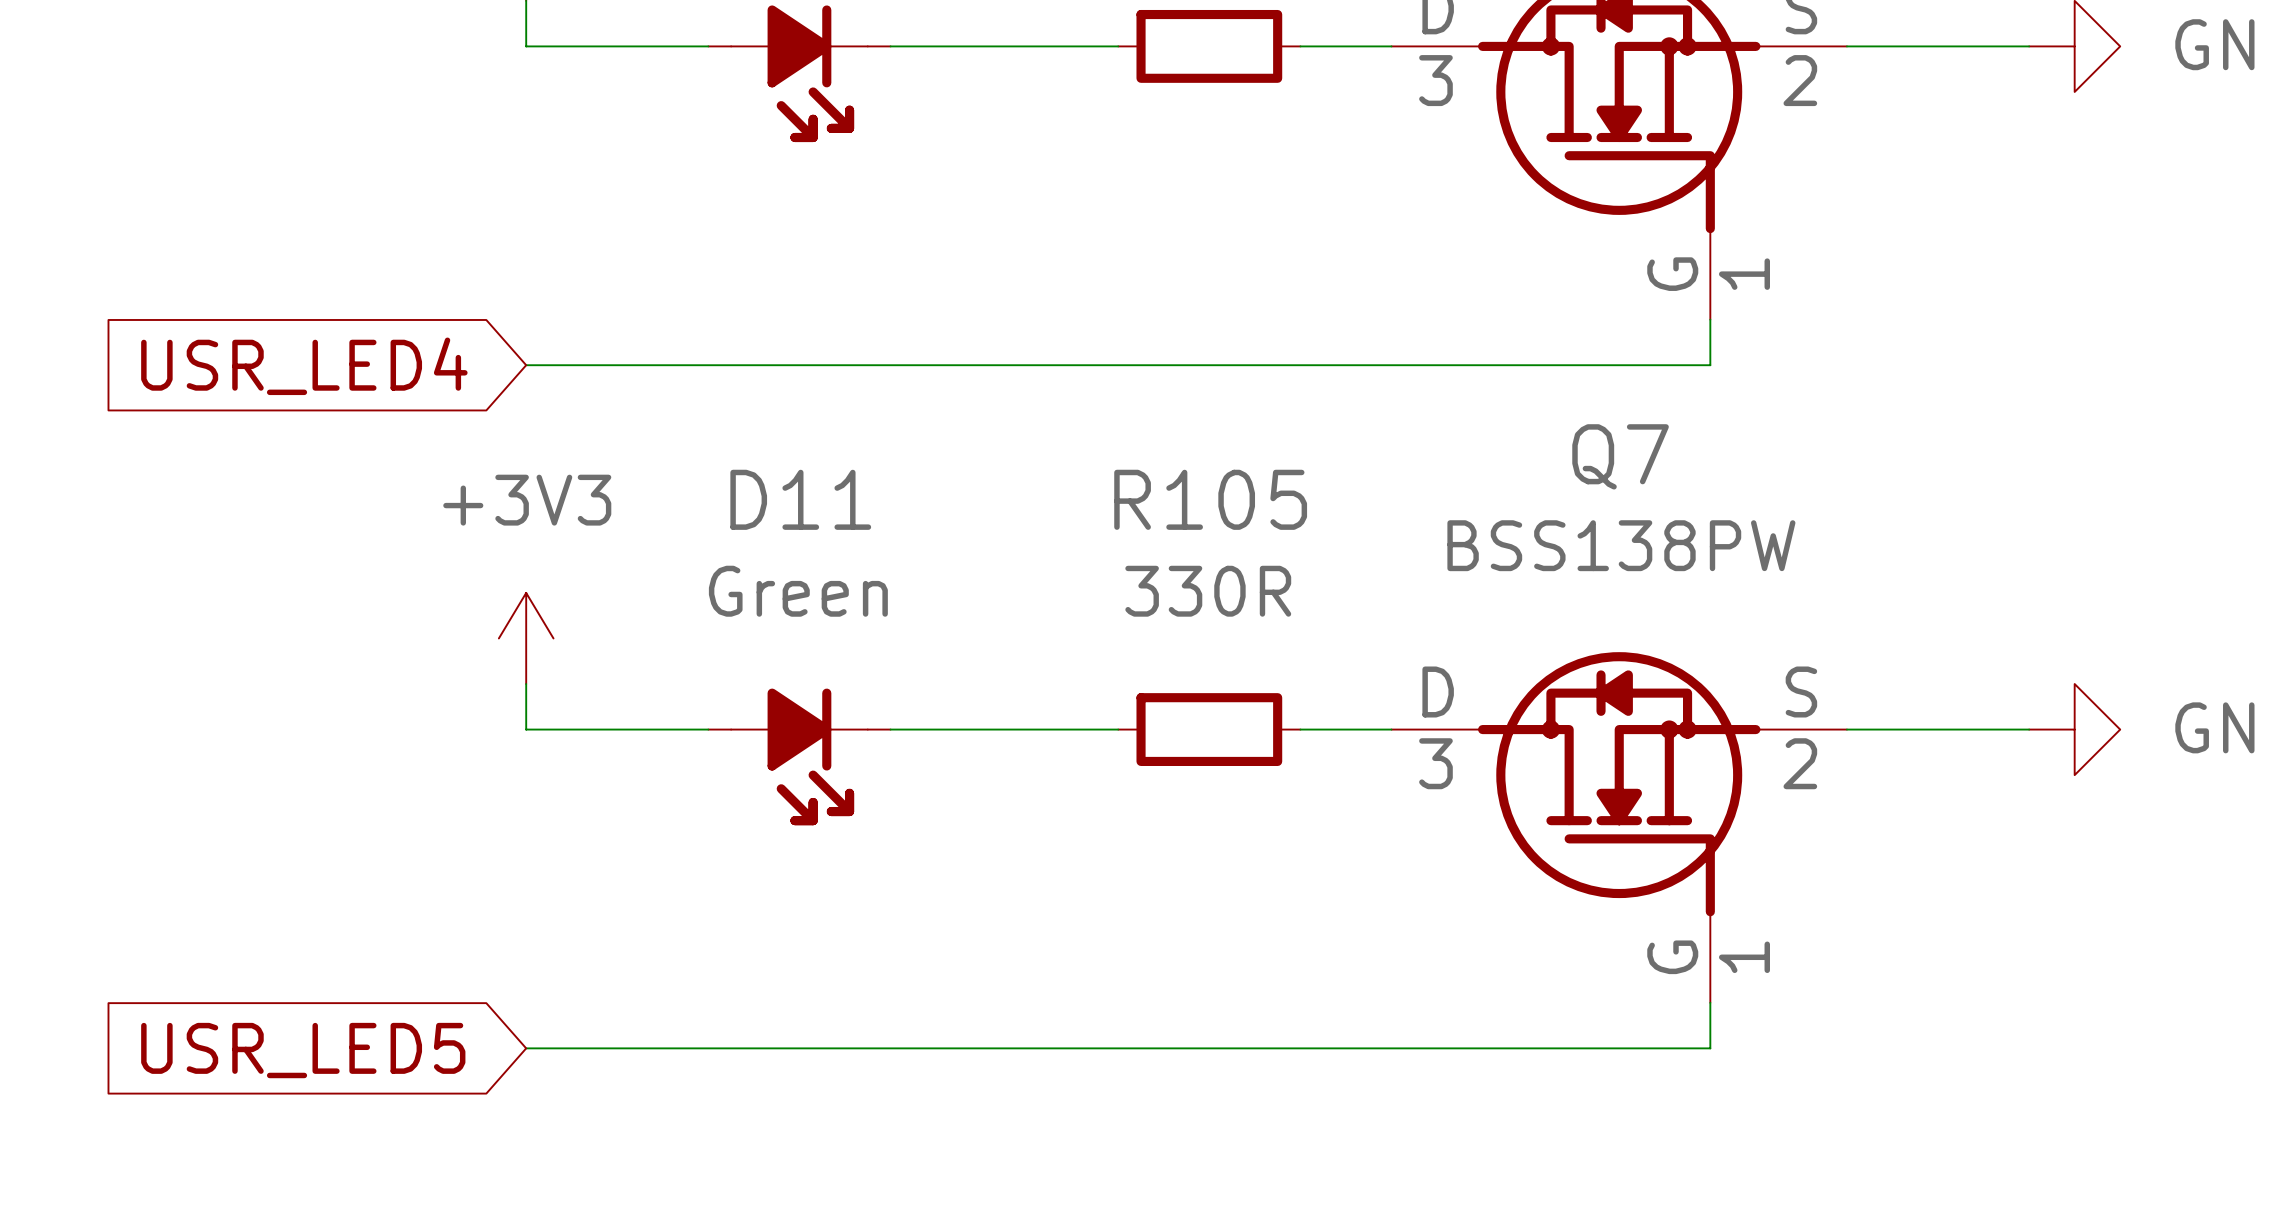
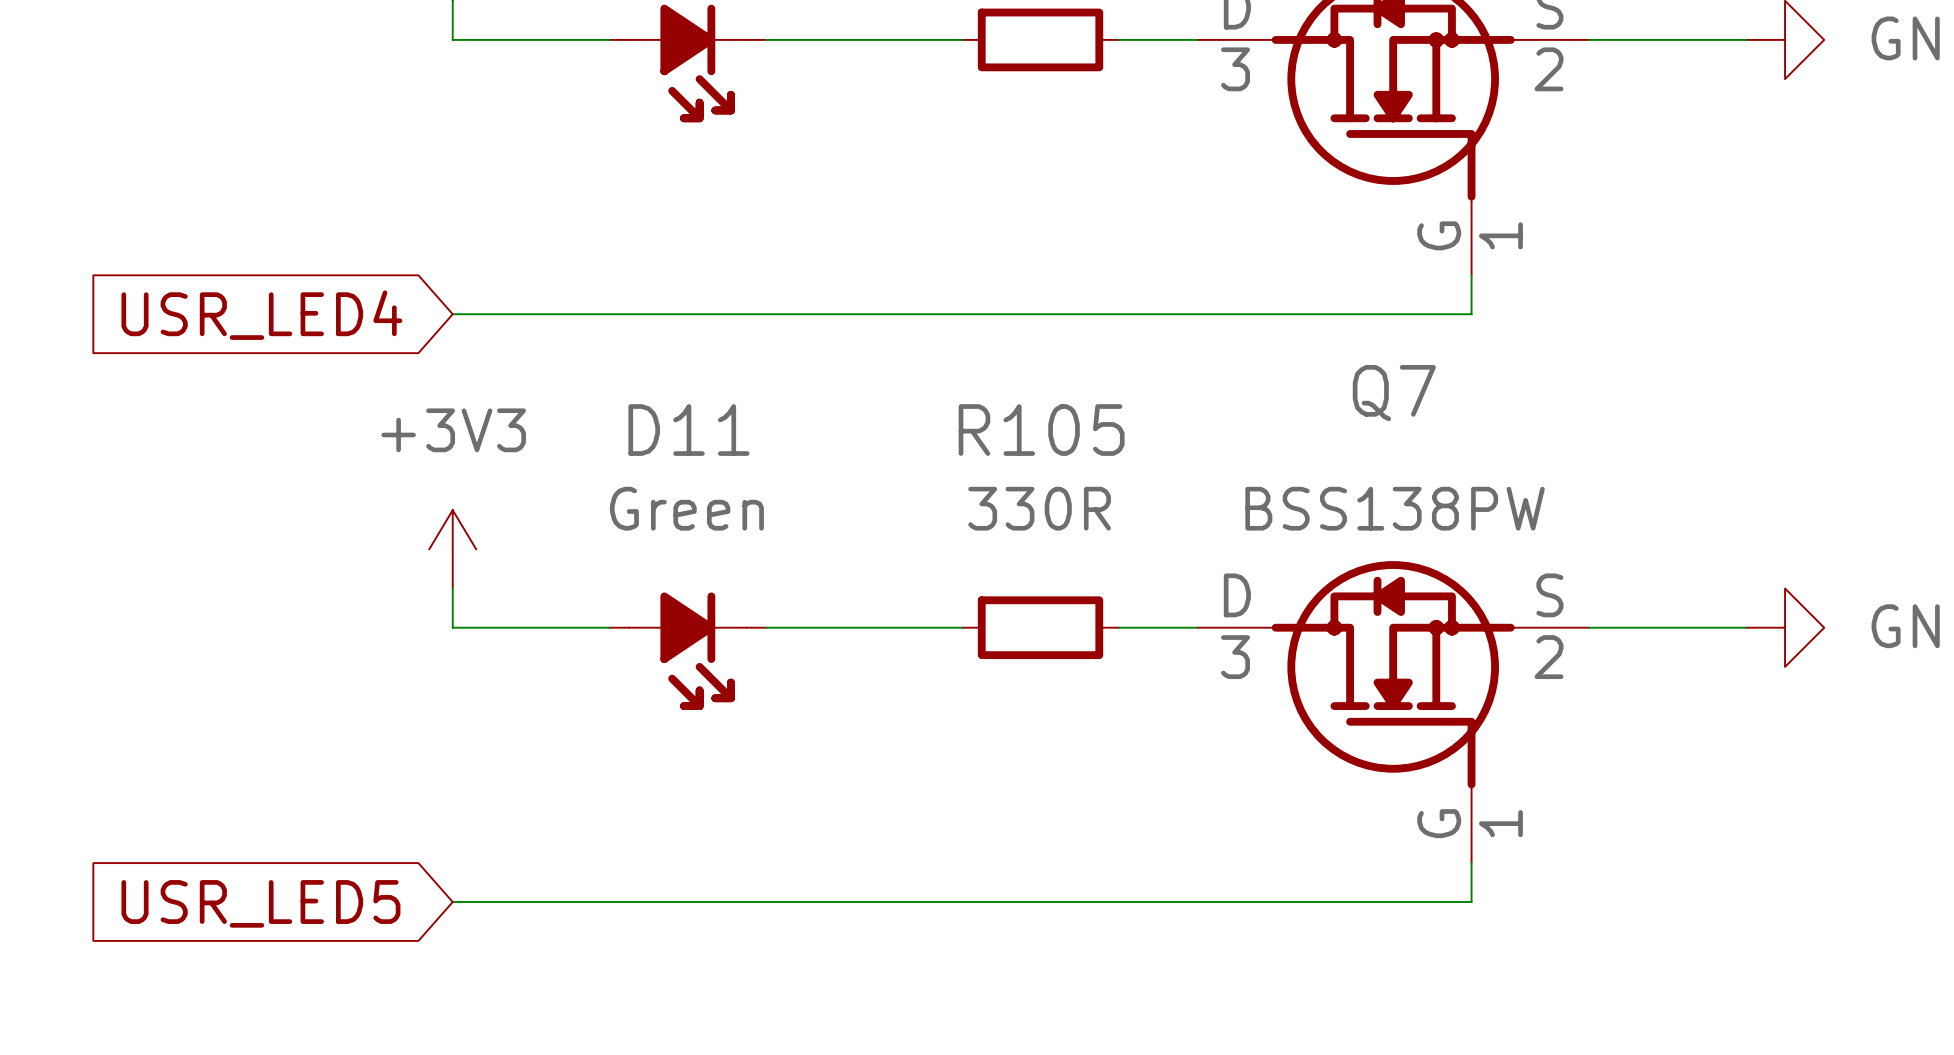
Q7 value position: BSS138PW (1621, 545) -> BSS138PW (1395, 508)

